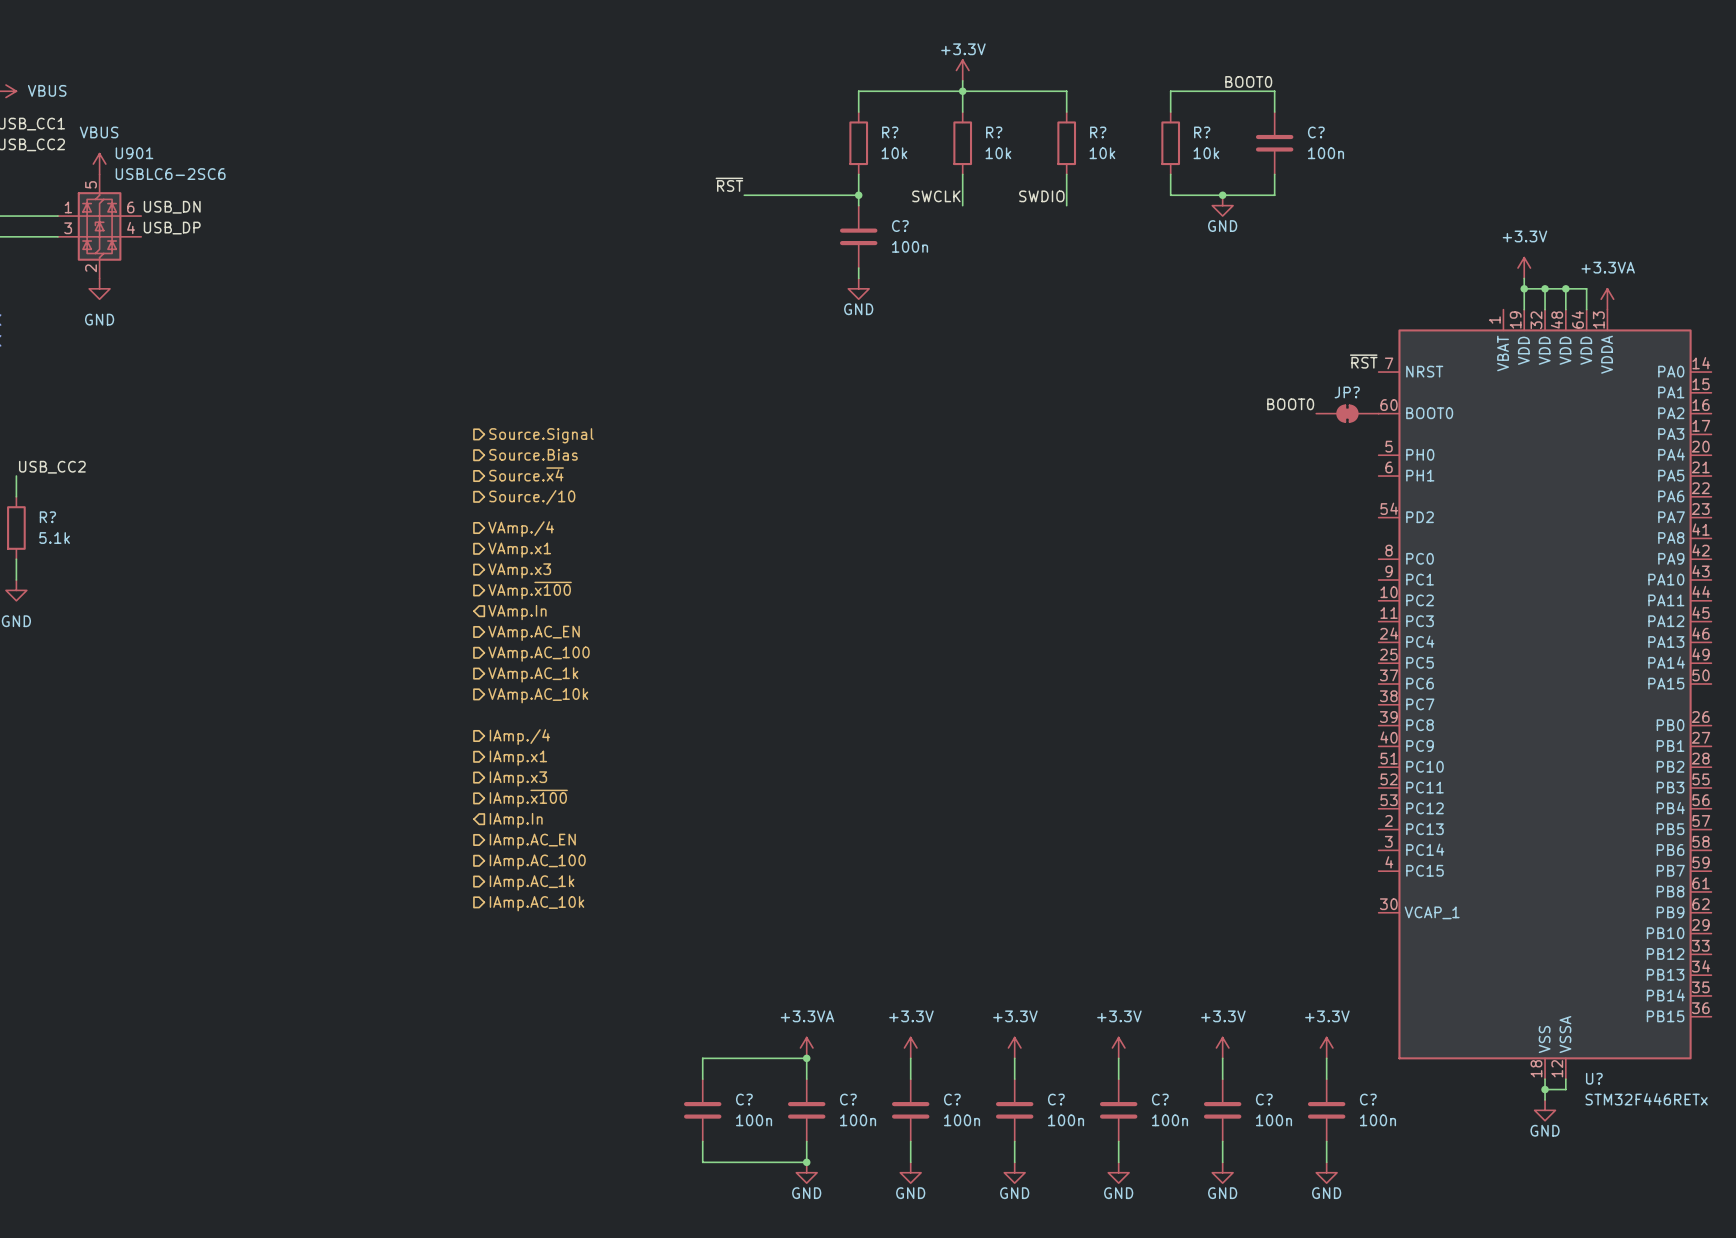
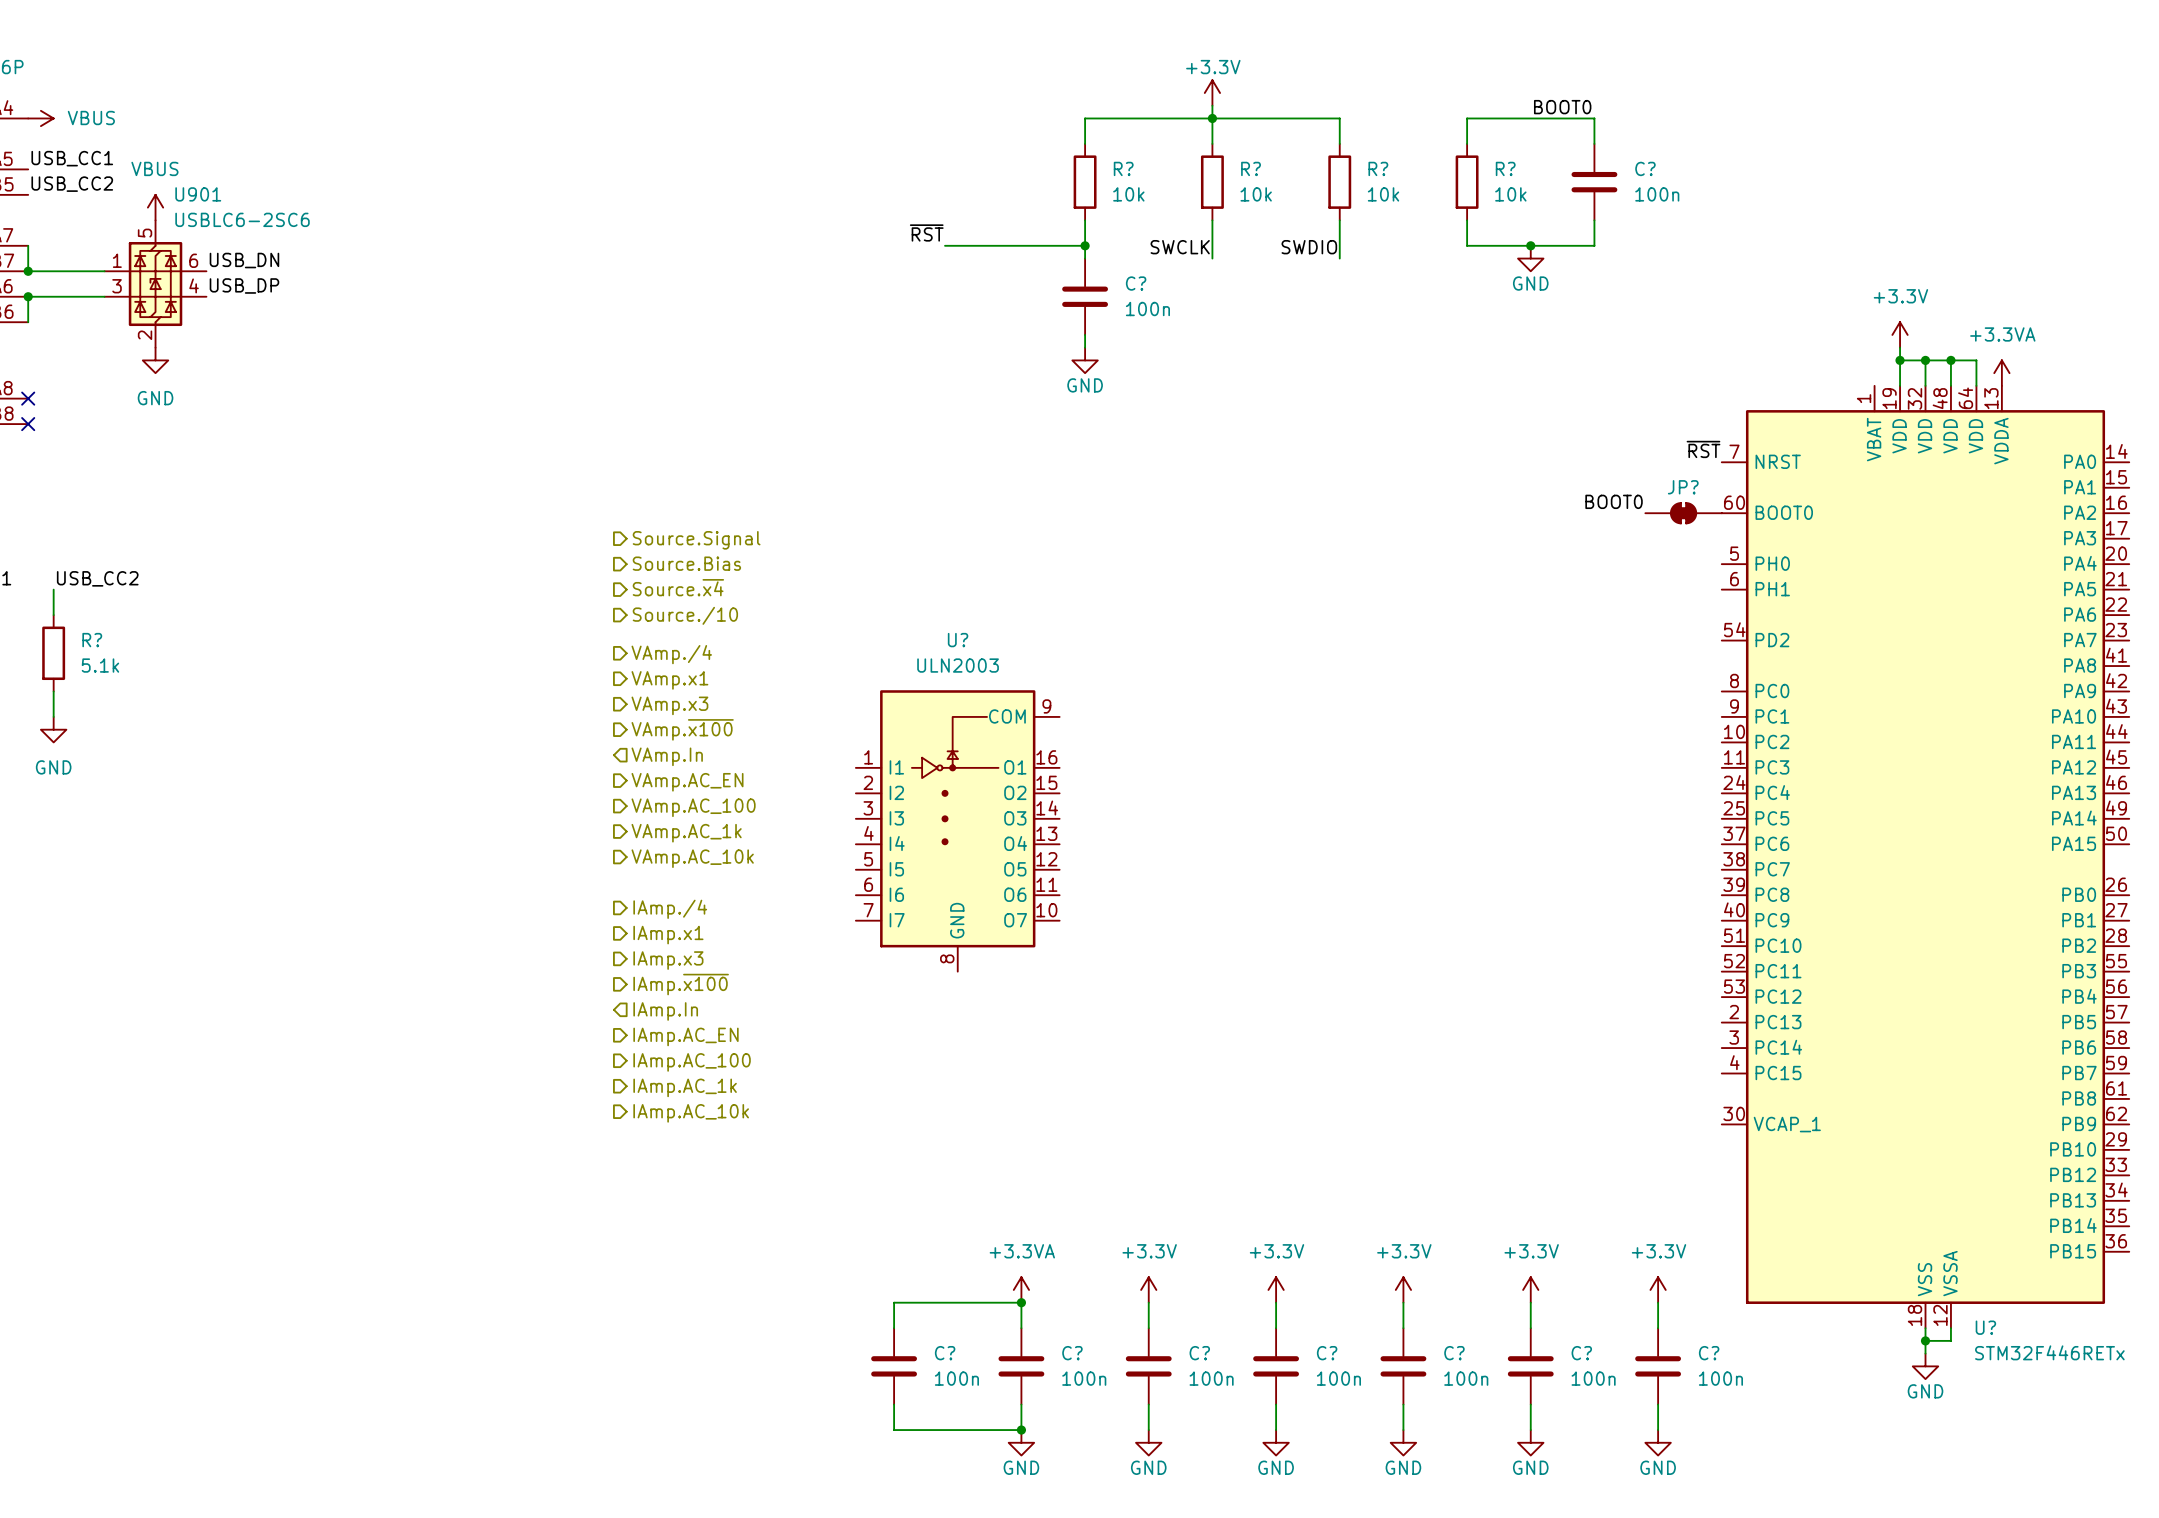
U?: none -> ULN2003 (957, 830)

